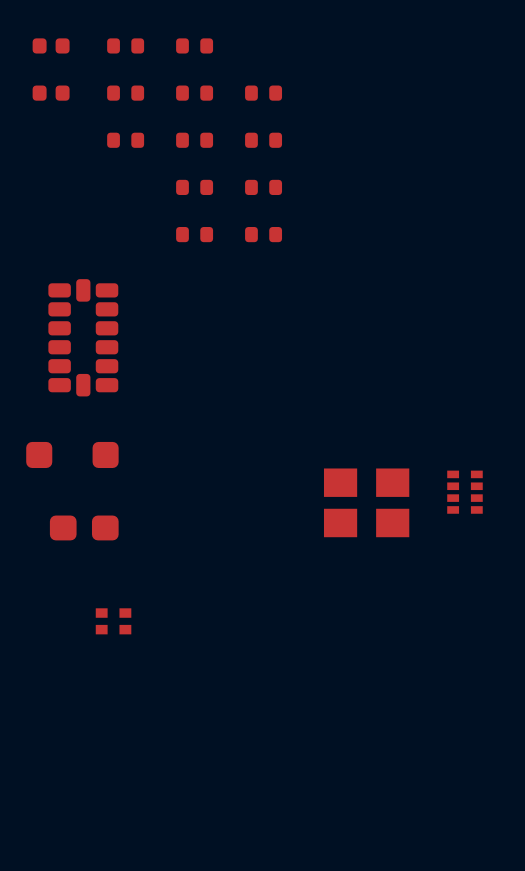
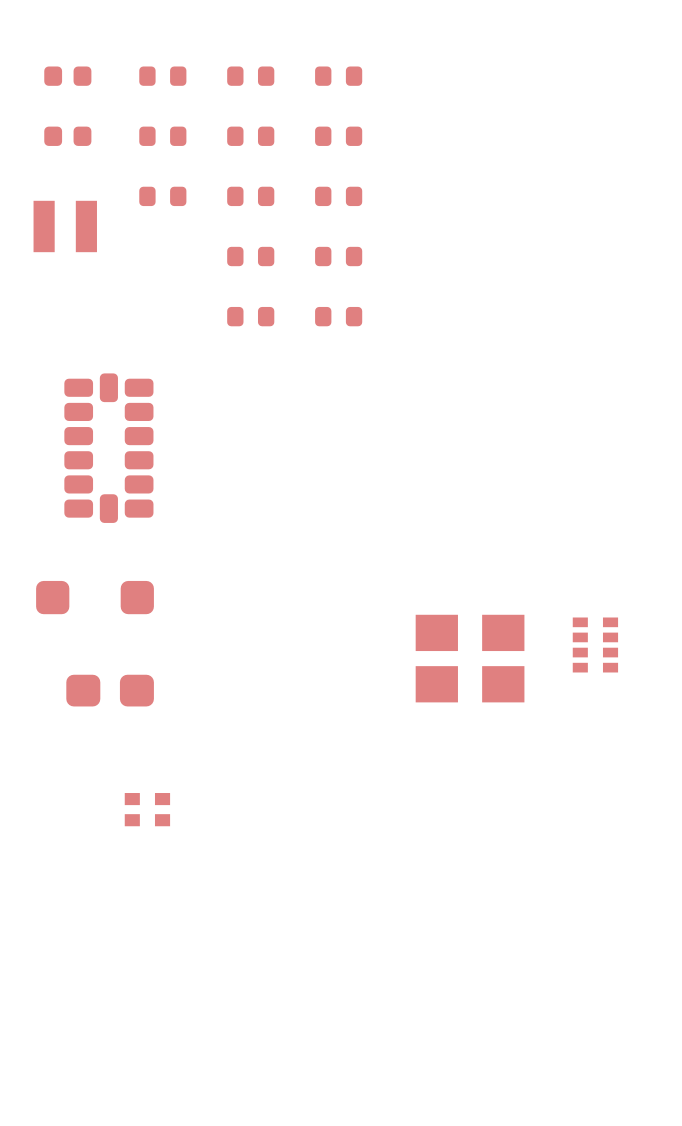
part: none -> (338, 76)
part: none -> (65, 226)

